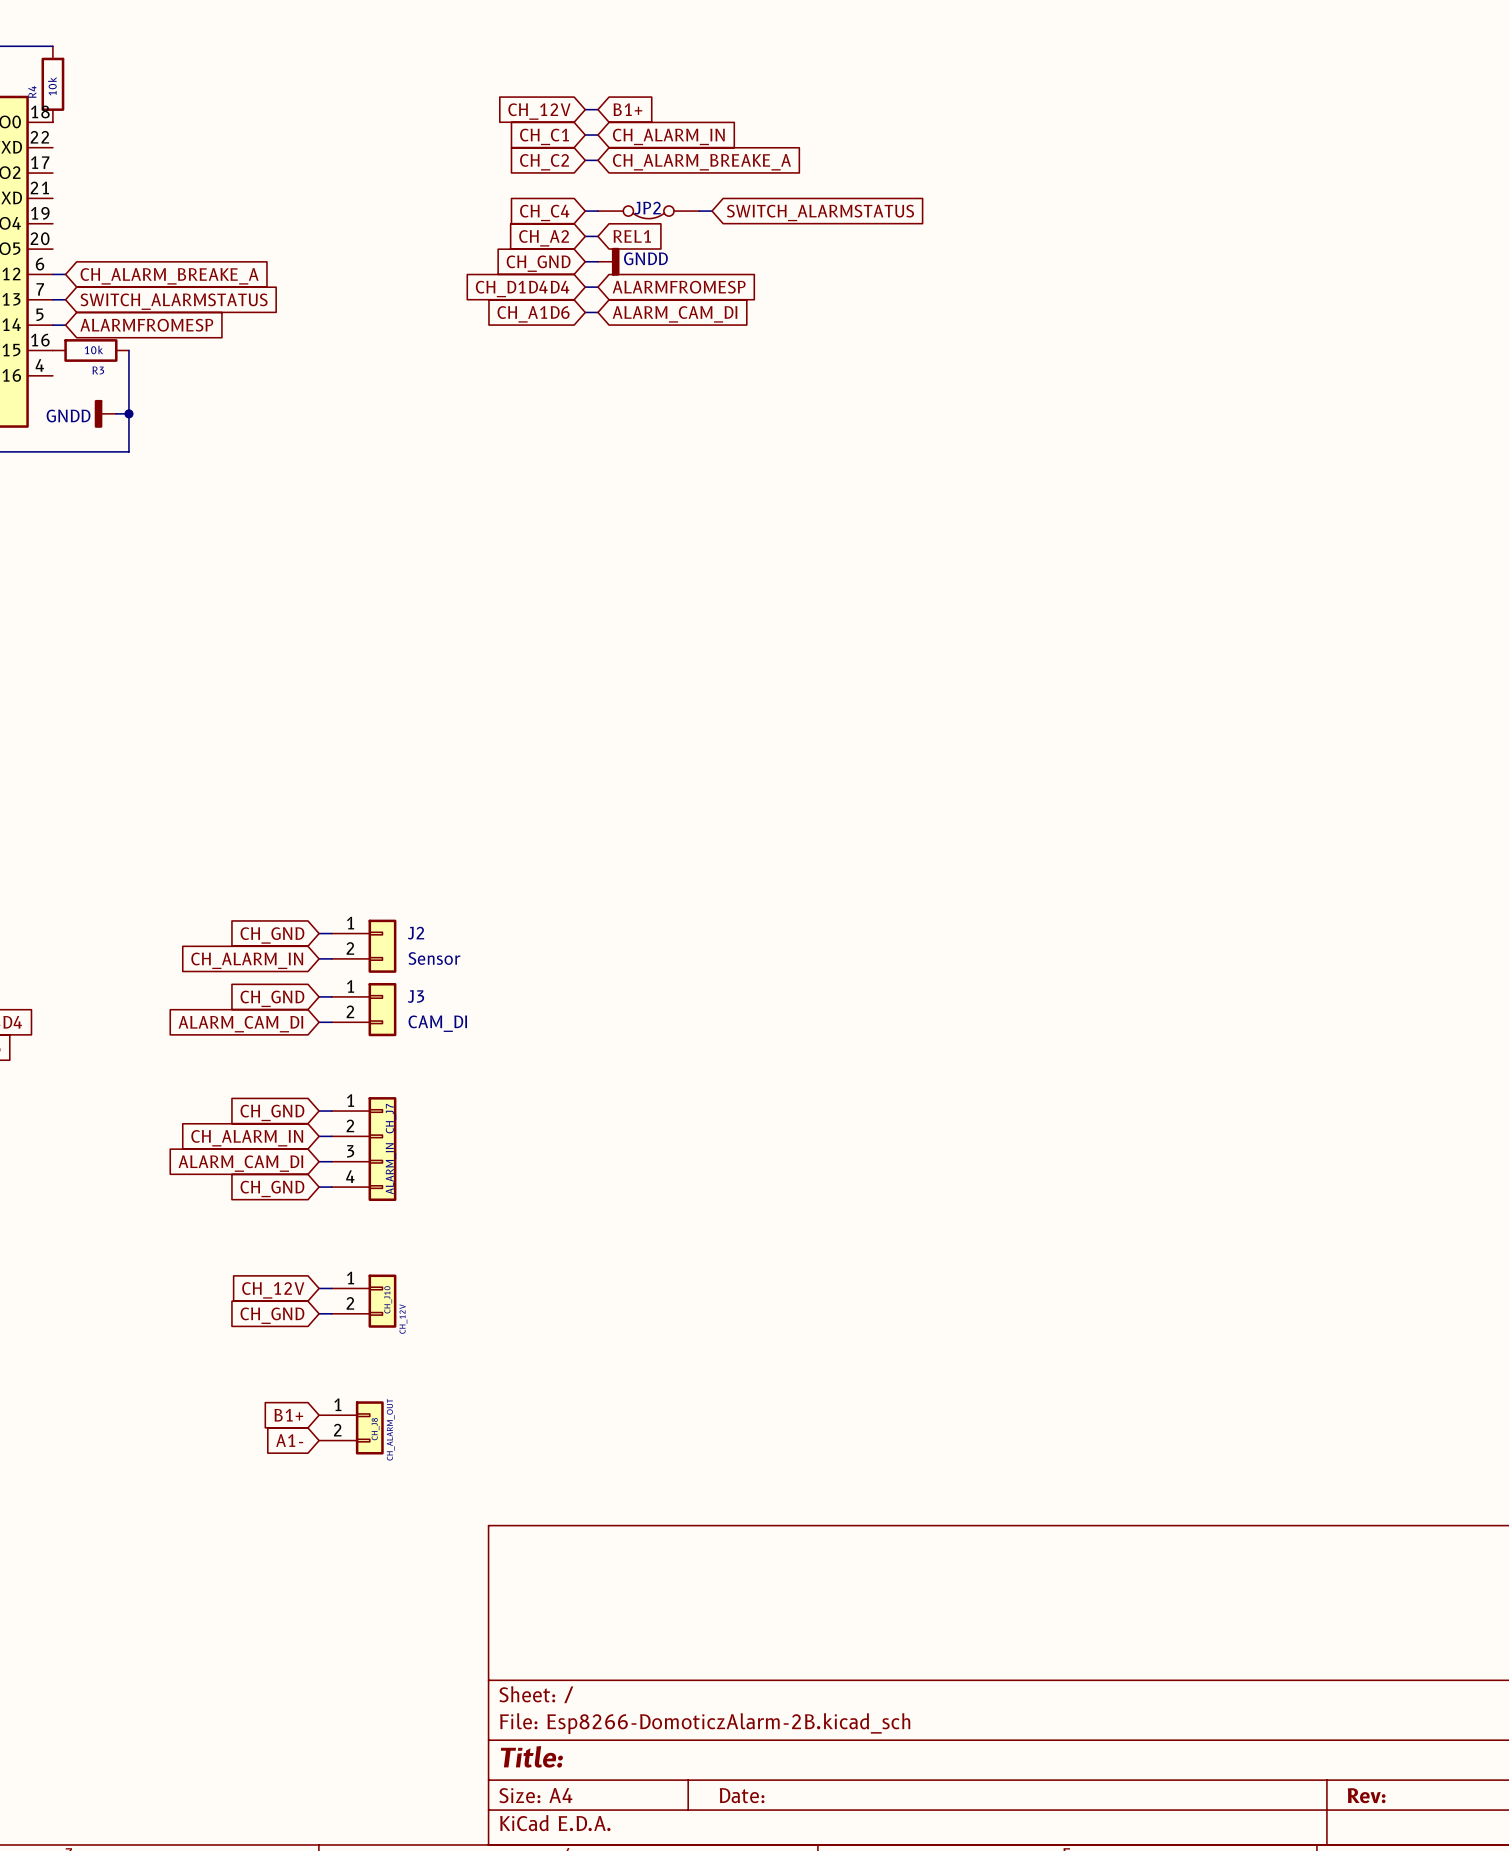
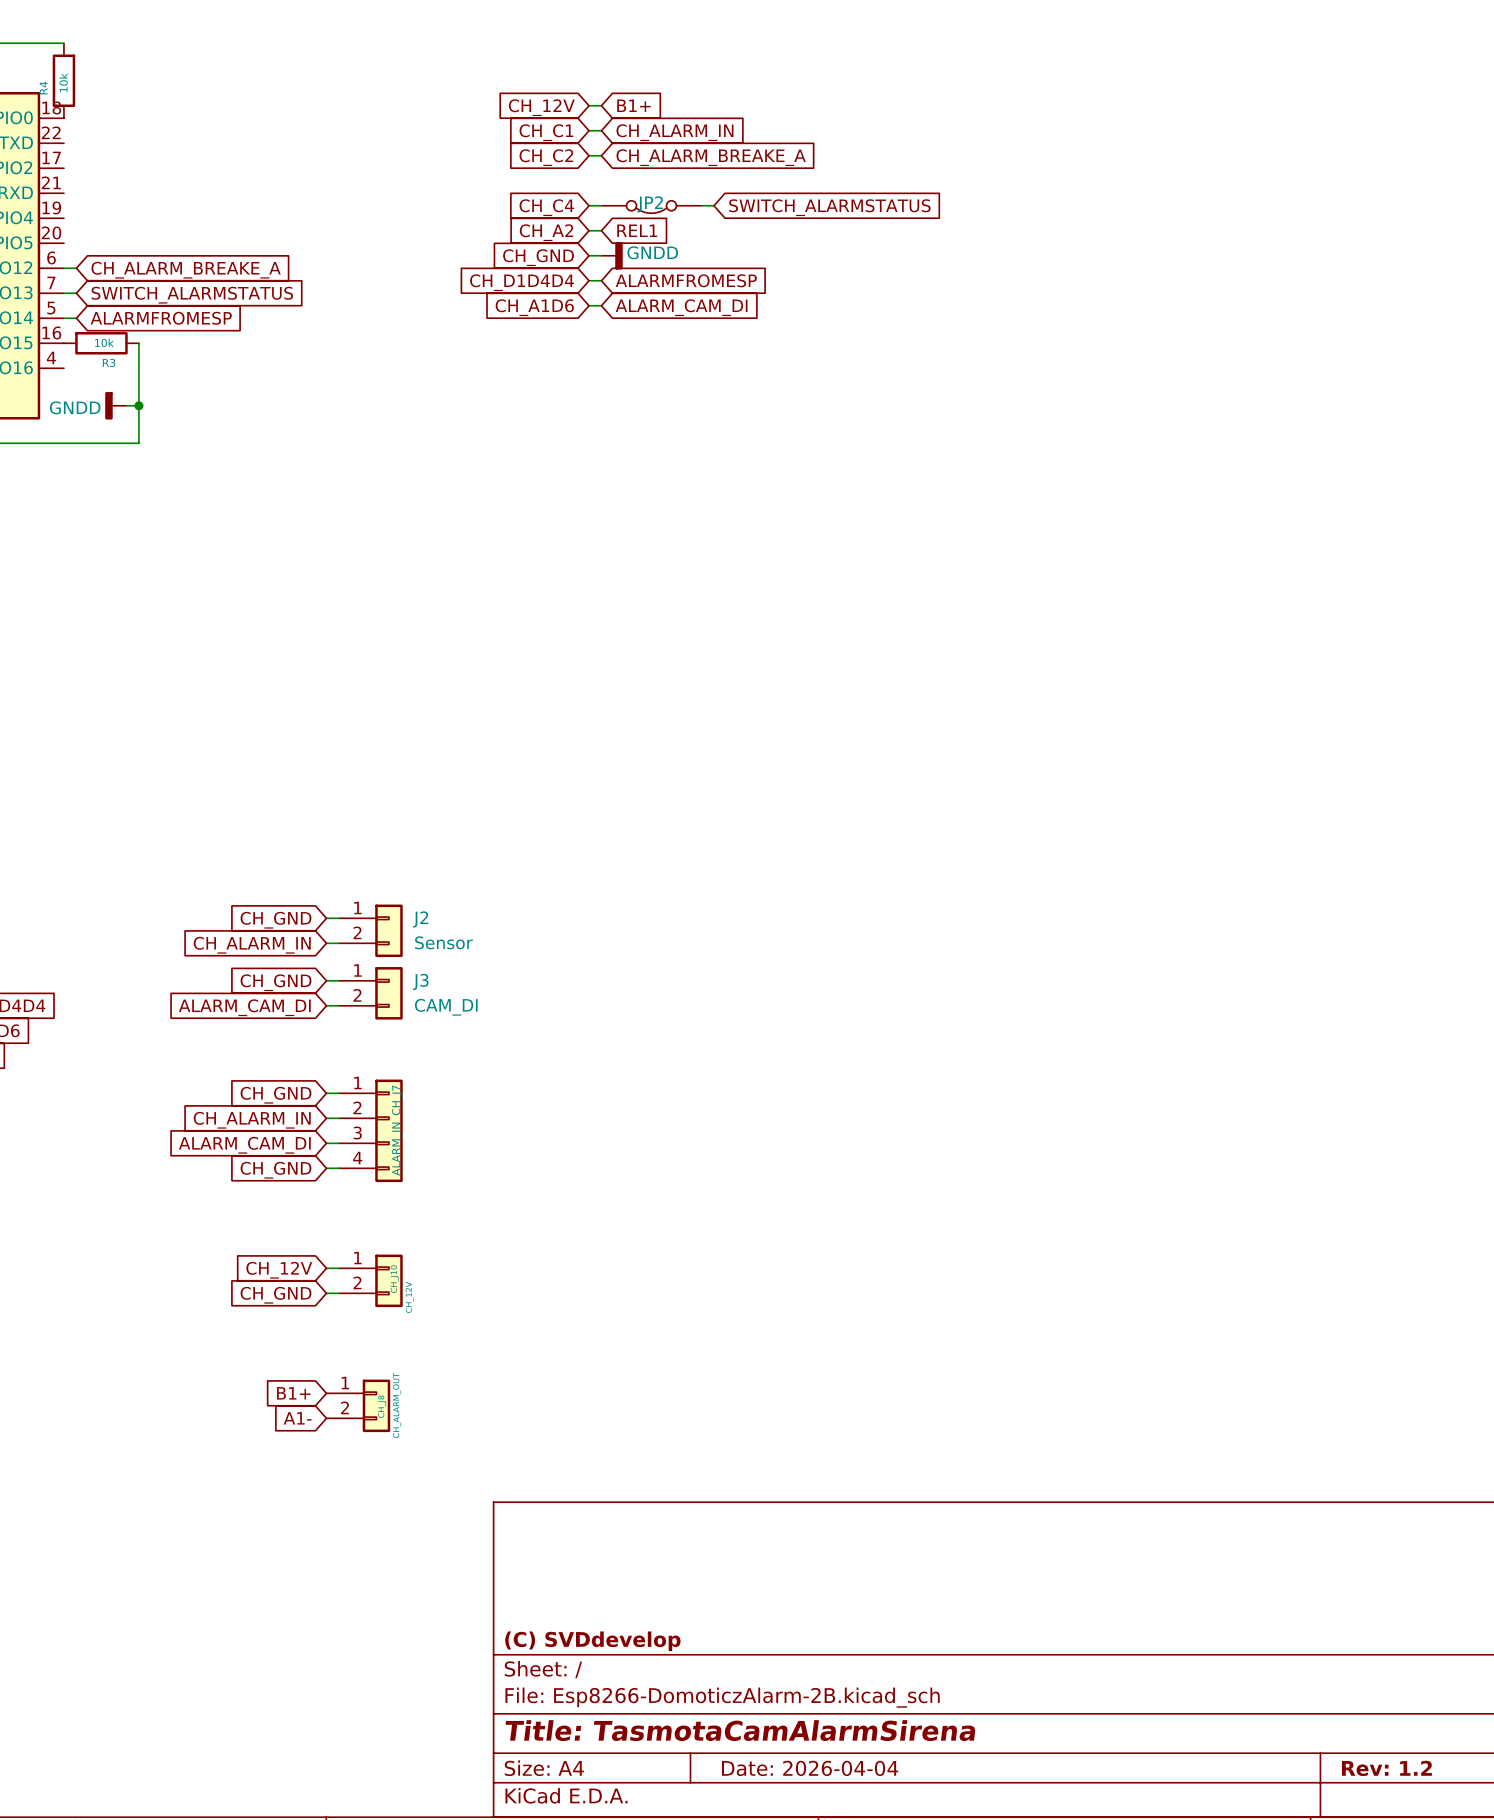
title block: none -> (C) SVDdevelop (592, 1641)
title block: Title: (531, 1756) -> Title: TasmotaCamAlarmSirena (740, 1730)
title block: Date: (742, 1795) -> Date: 2026-04-04 (810, 1768)
title block: Rev: (1366, 1795) -> Rev: 1.2 (1386, 1768)

